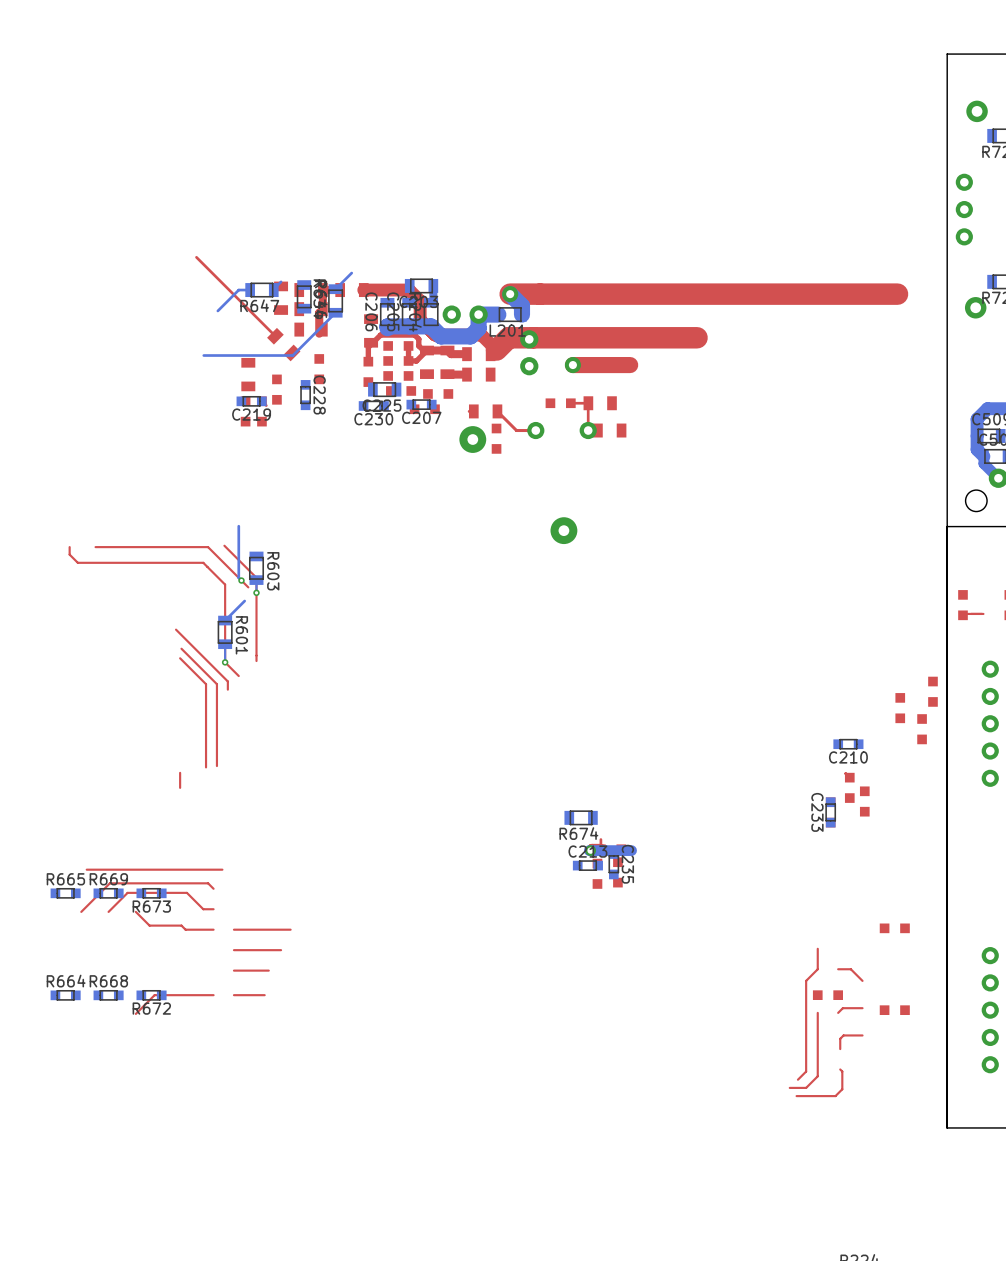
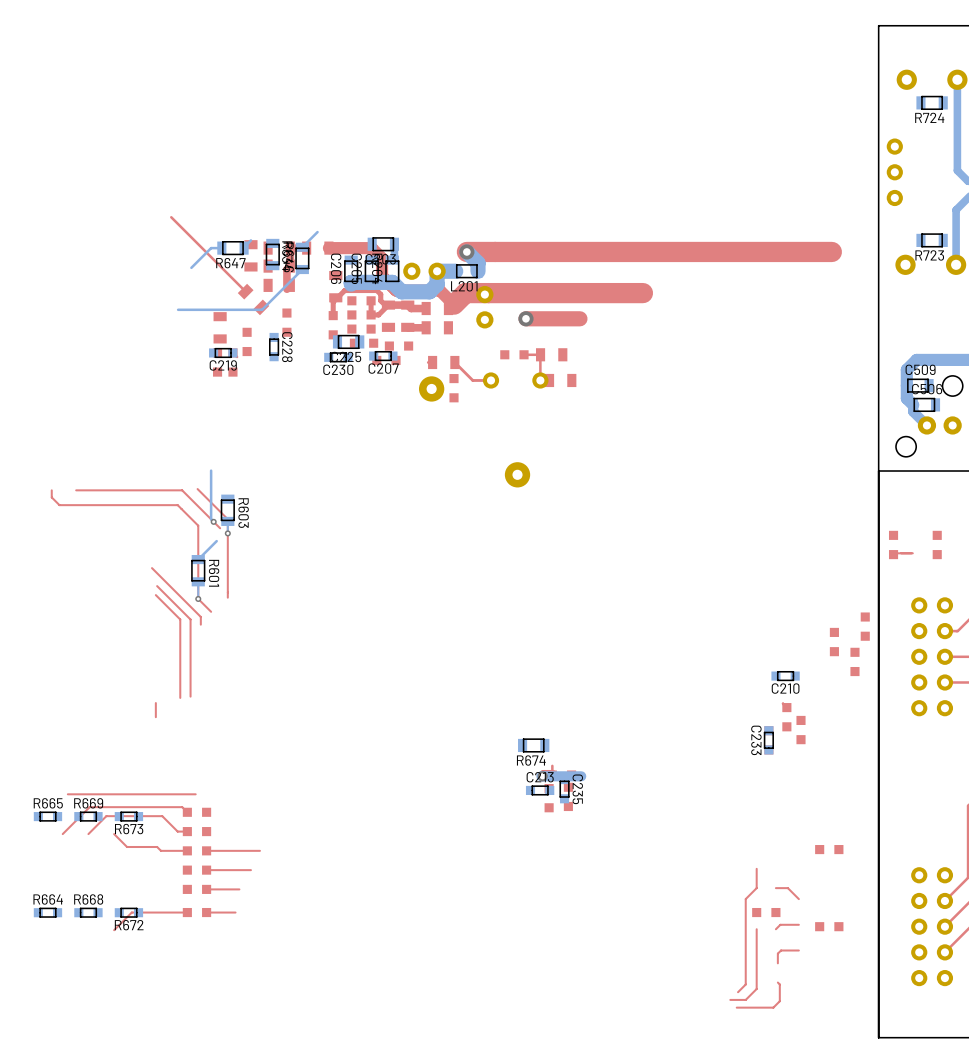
part: none -> (196, 812)
part: none -> (196, 831)
part: none -> (196, 850)
part: none -> (196, 870)
part: none -> (196, 889)
part: none -> (196, 912)

